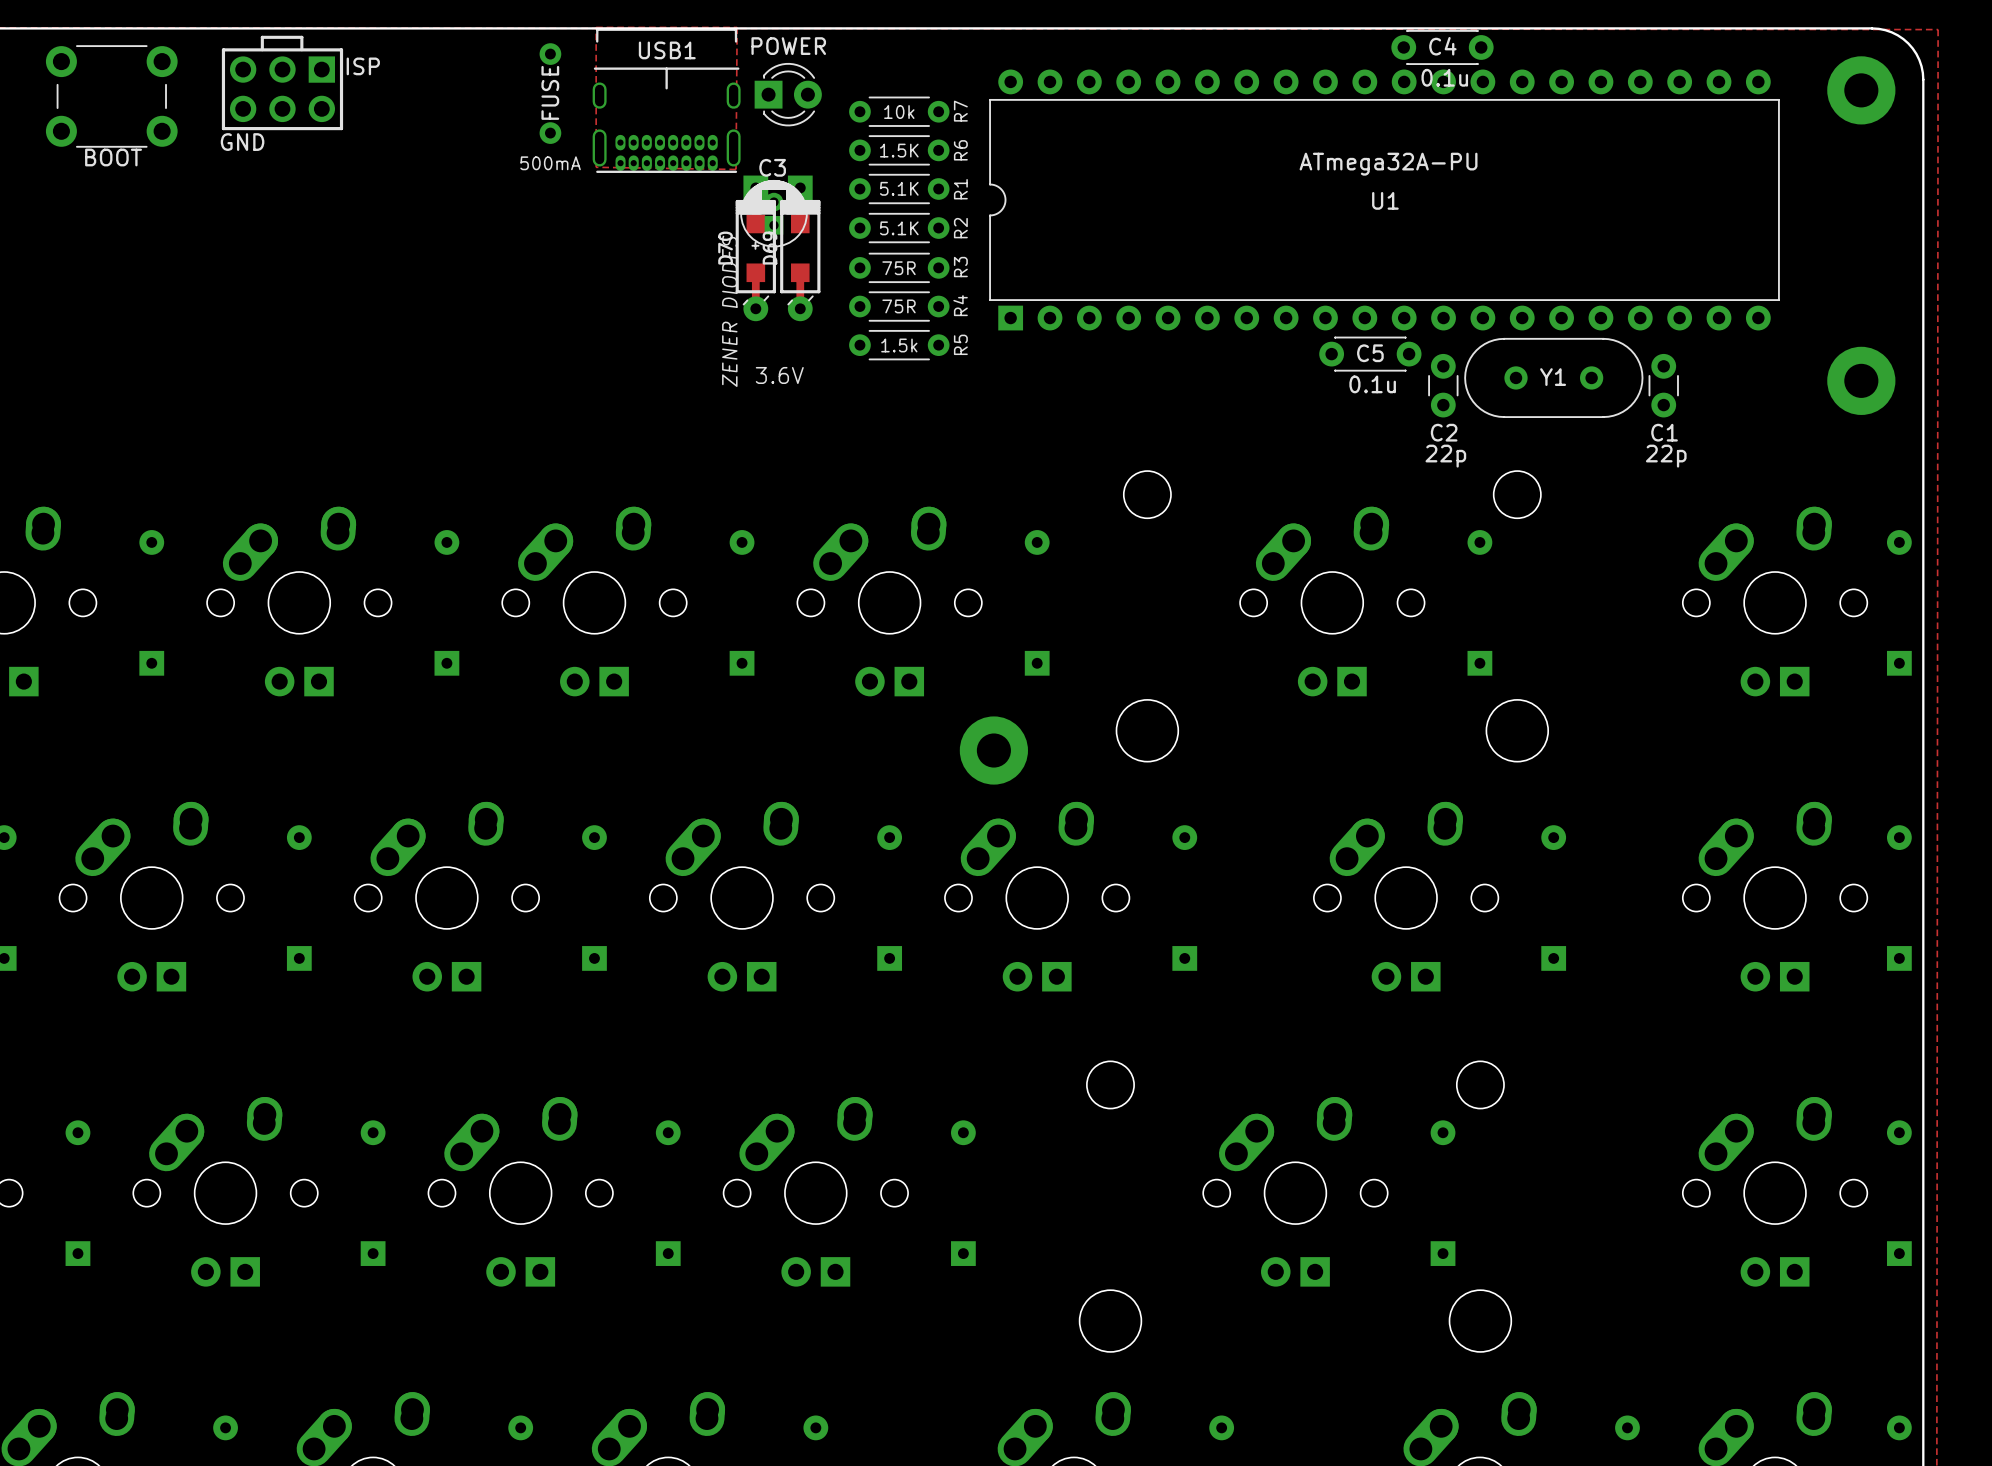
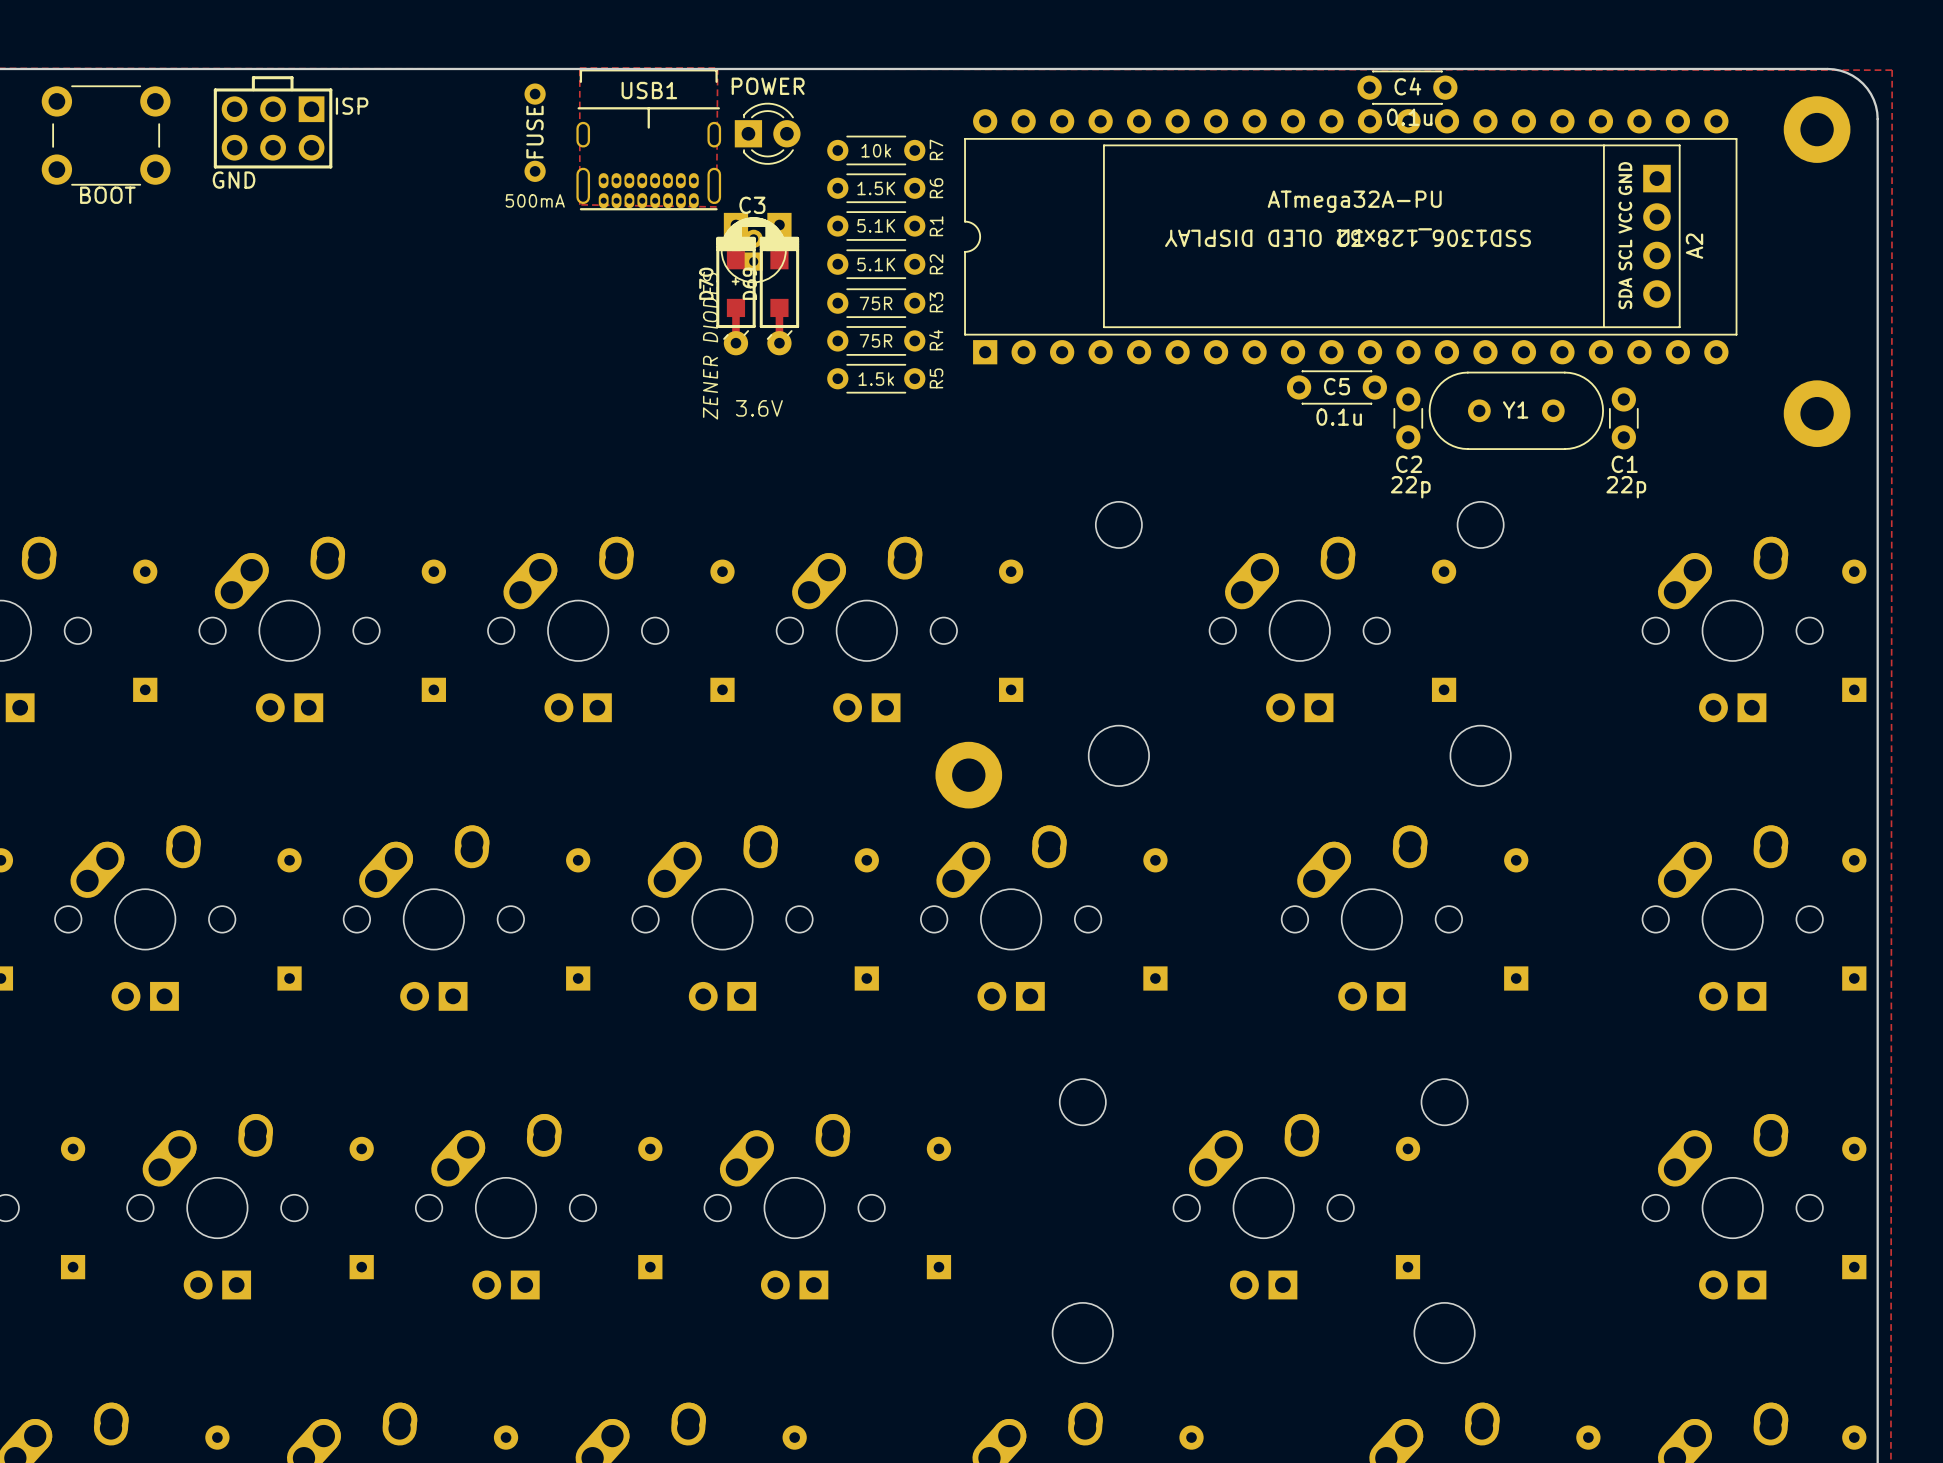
A2: none -> (1391, 236)

